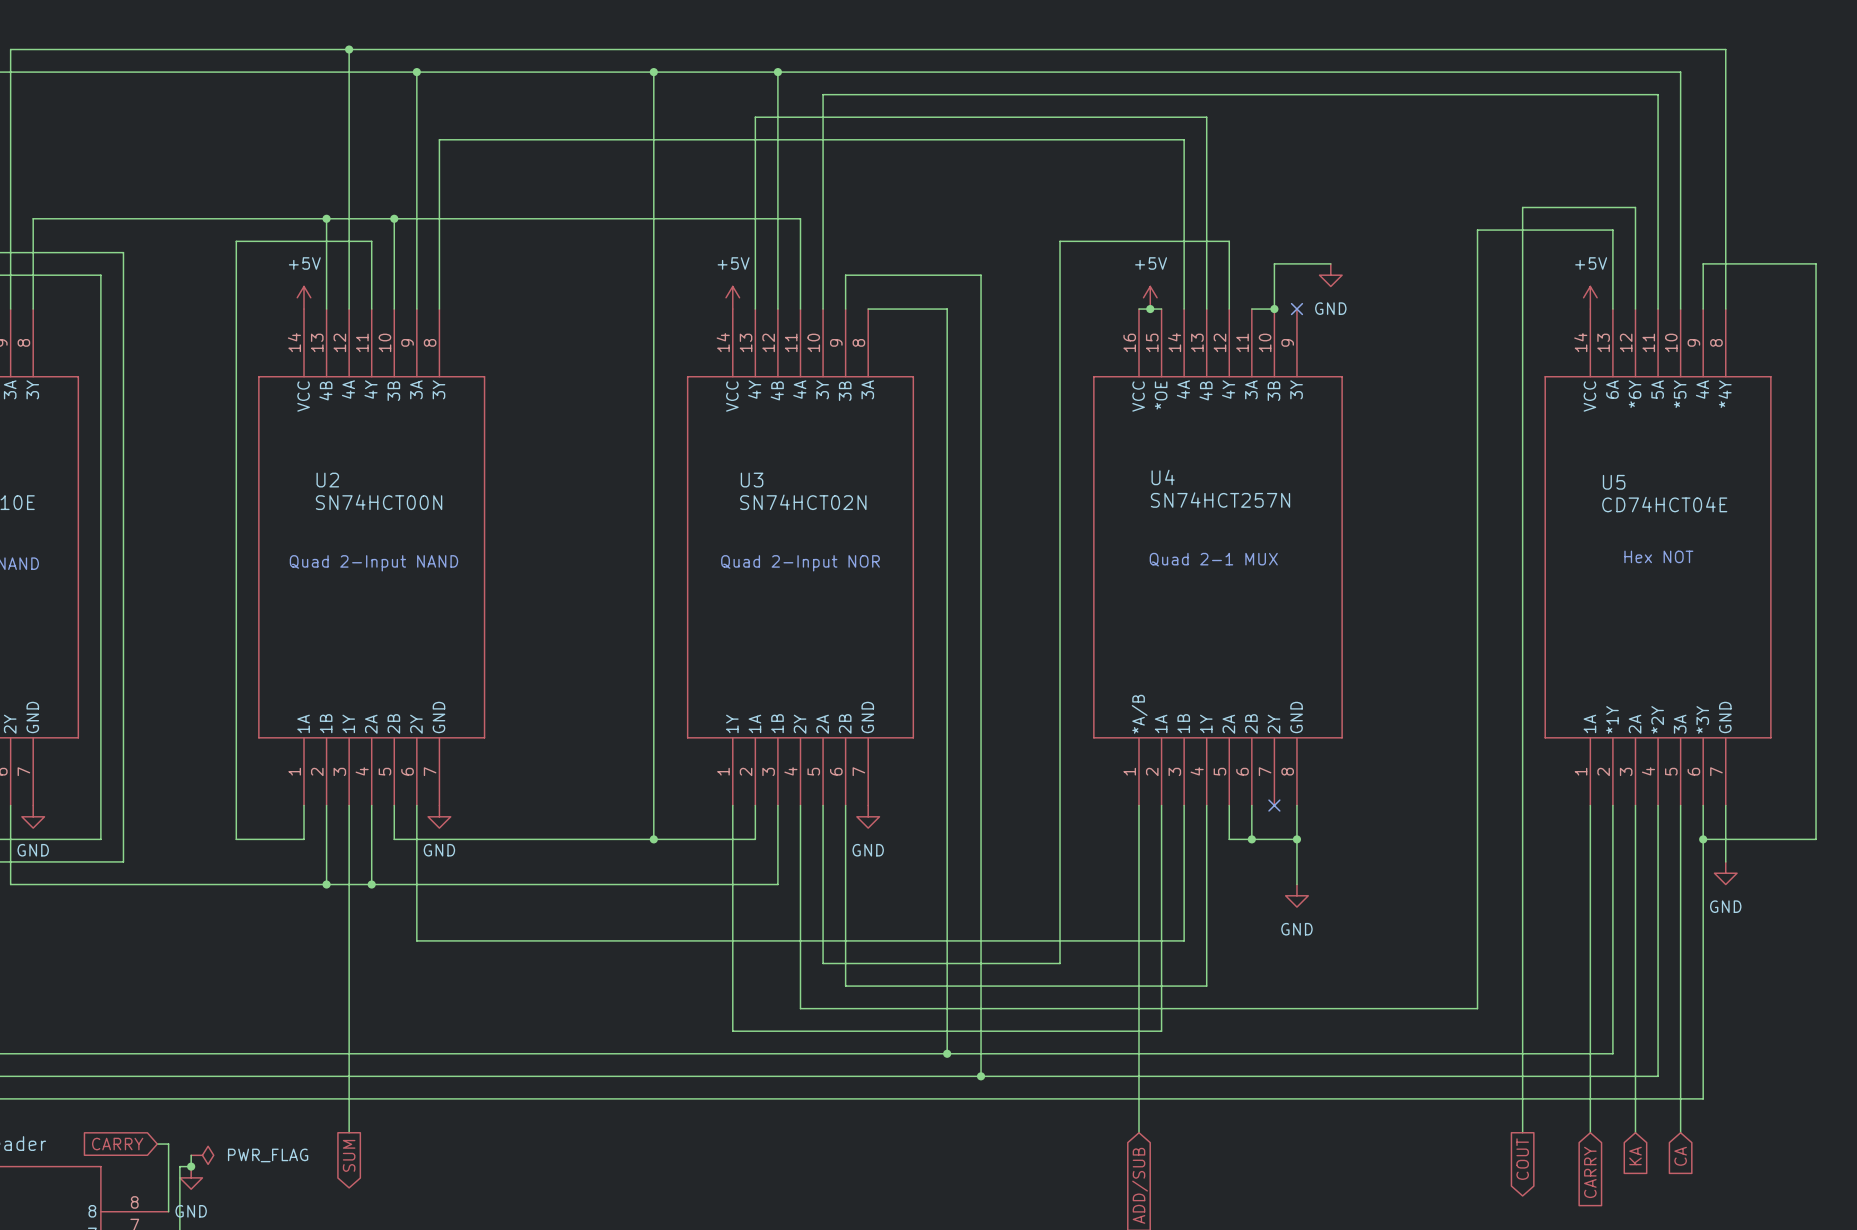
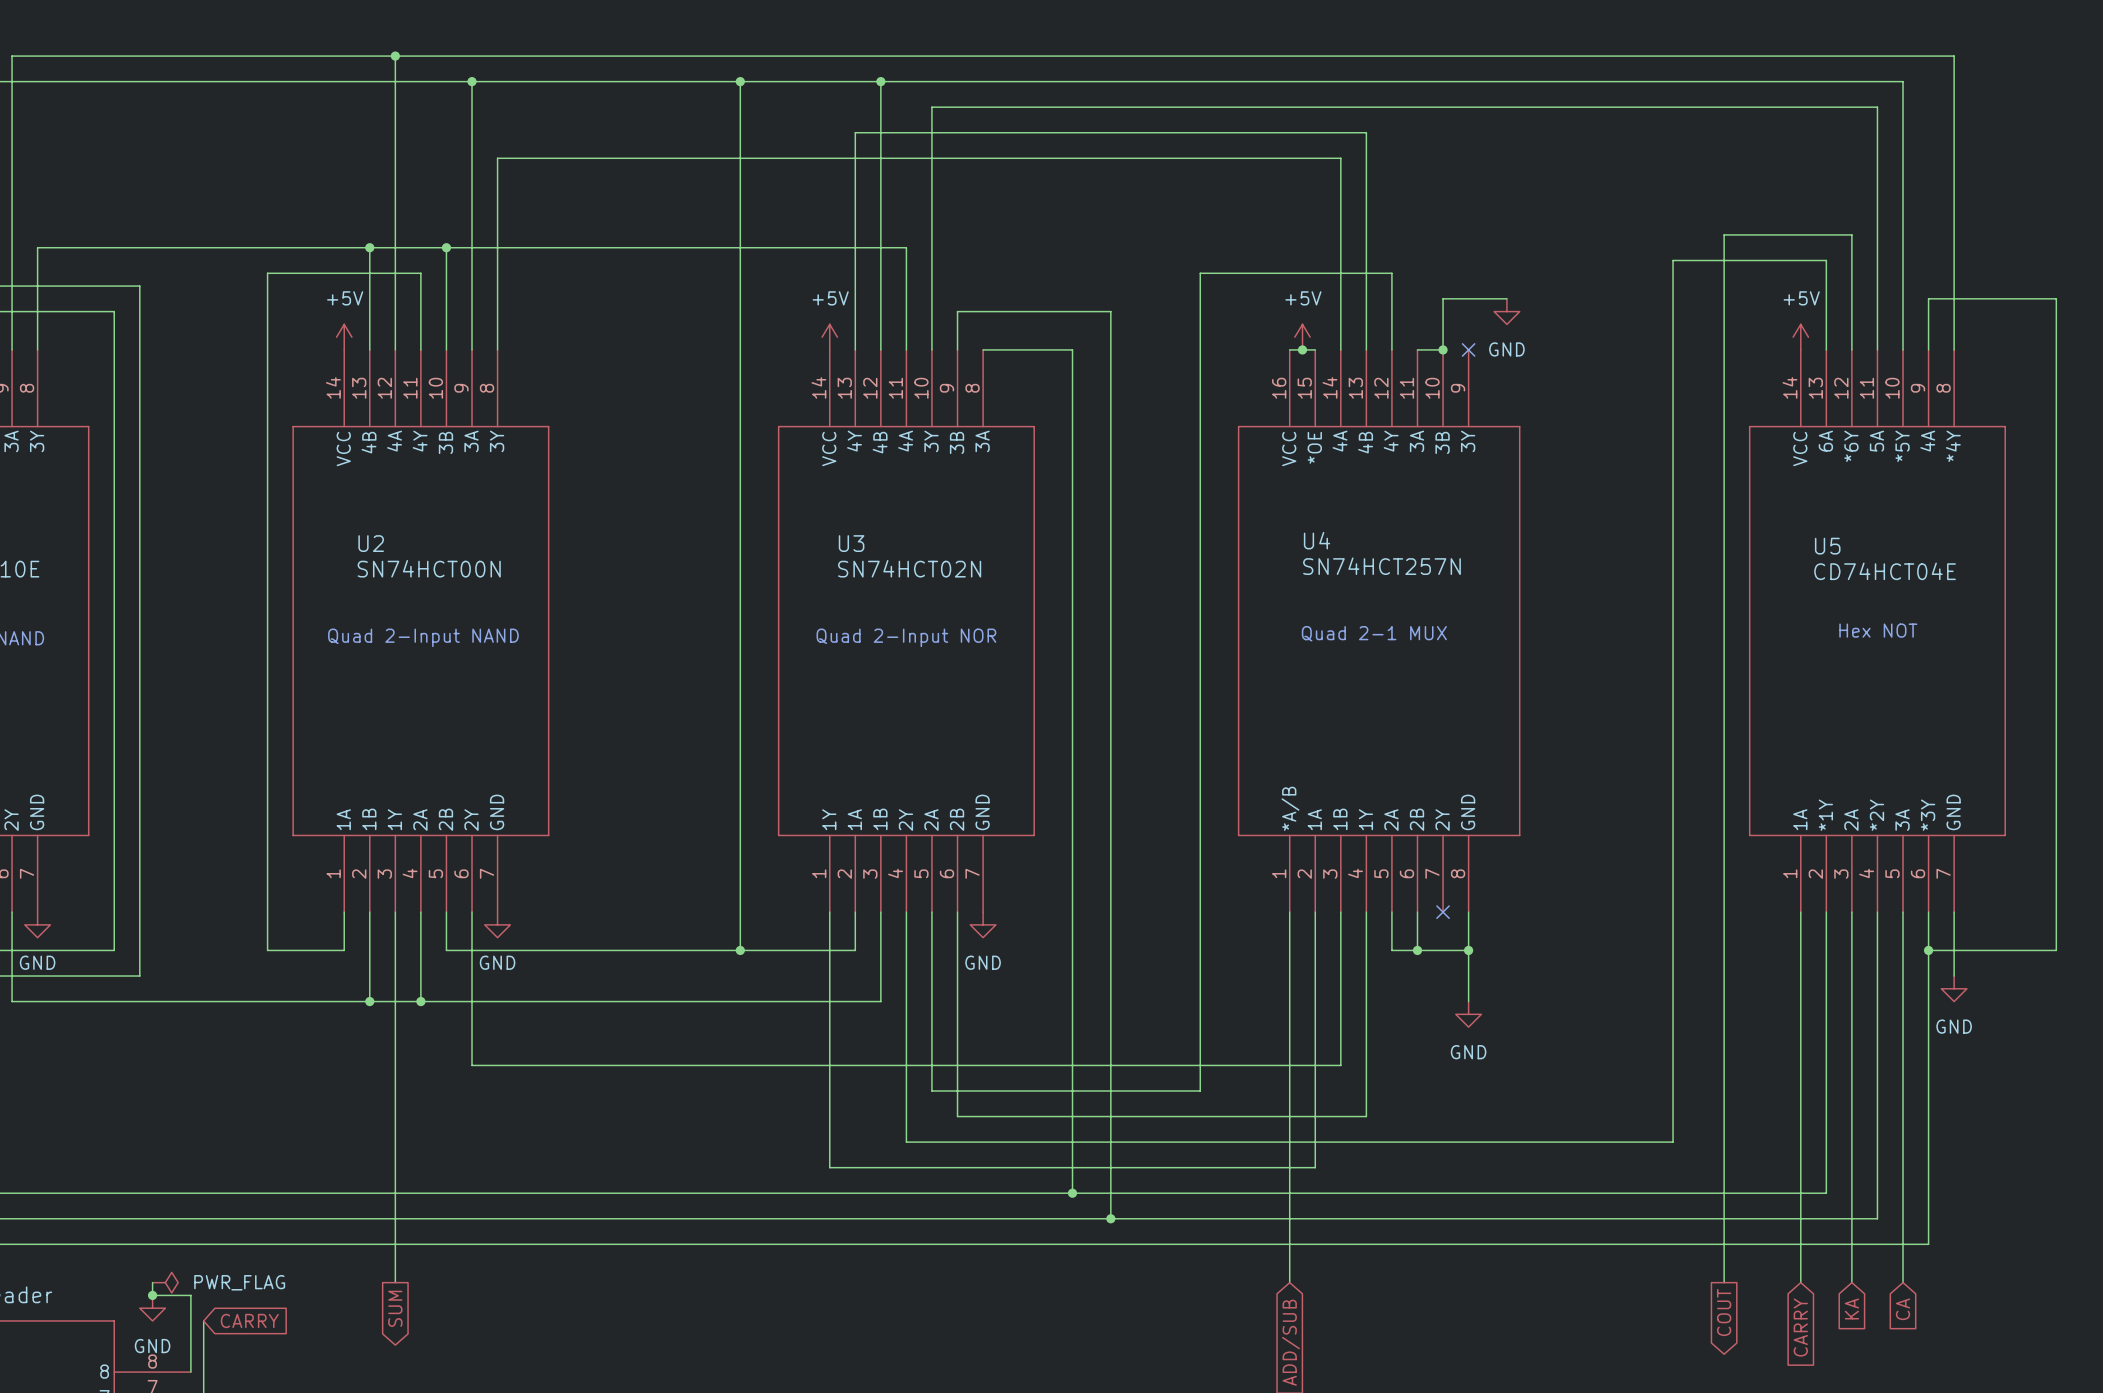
wire: none -> (152, 1282) (152, 1295) (178, 1295)
global label rotation: 0° (117, 1144) -> 180° (249, 1320)
global label position: CARRY (117, 1144) -> CARRY (249, 1320)
junction: none -> (152, 1295)
wire: (191, 1155) (191, 1166) (179, 1166) -> none
power symbol position: PWR_FLAG (202, 1155) -> PWR_FLAG (165, 1282)
junction: (191, 1166) -> none
power symbol position: GND (191, 1177) -> GND (152, 1308)

